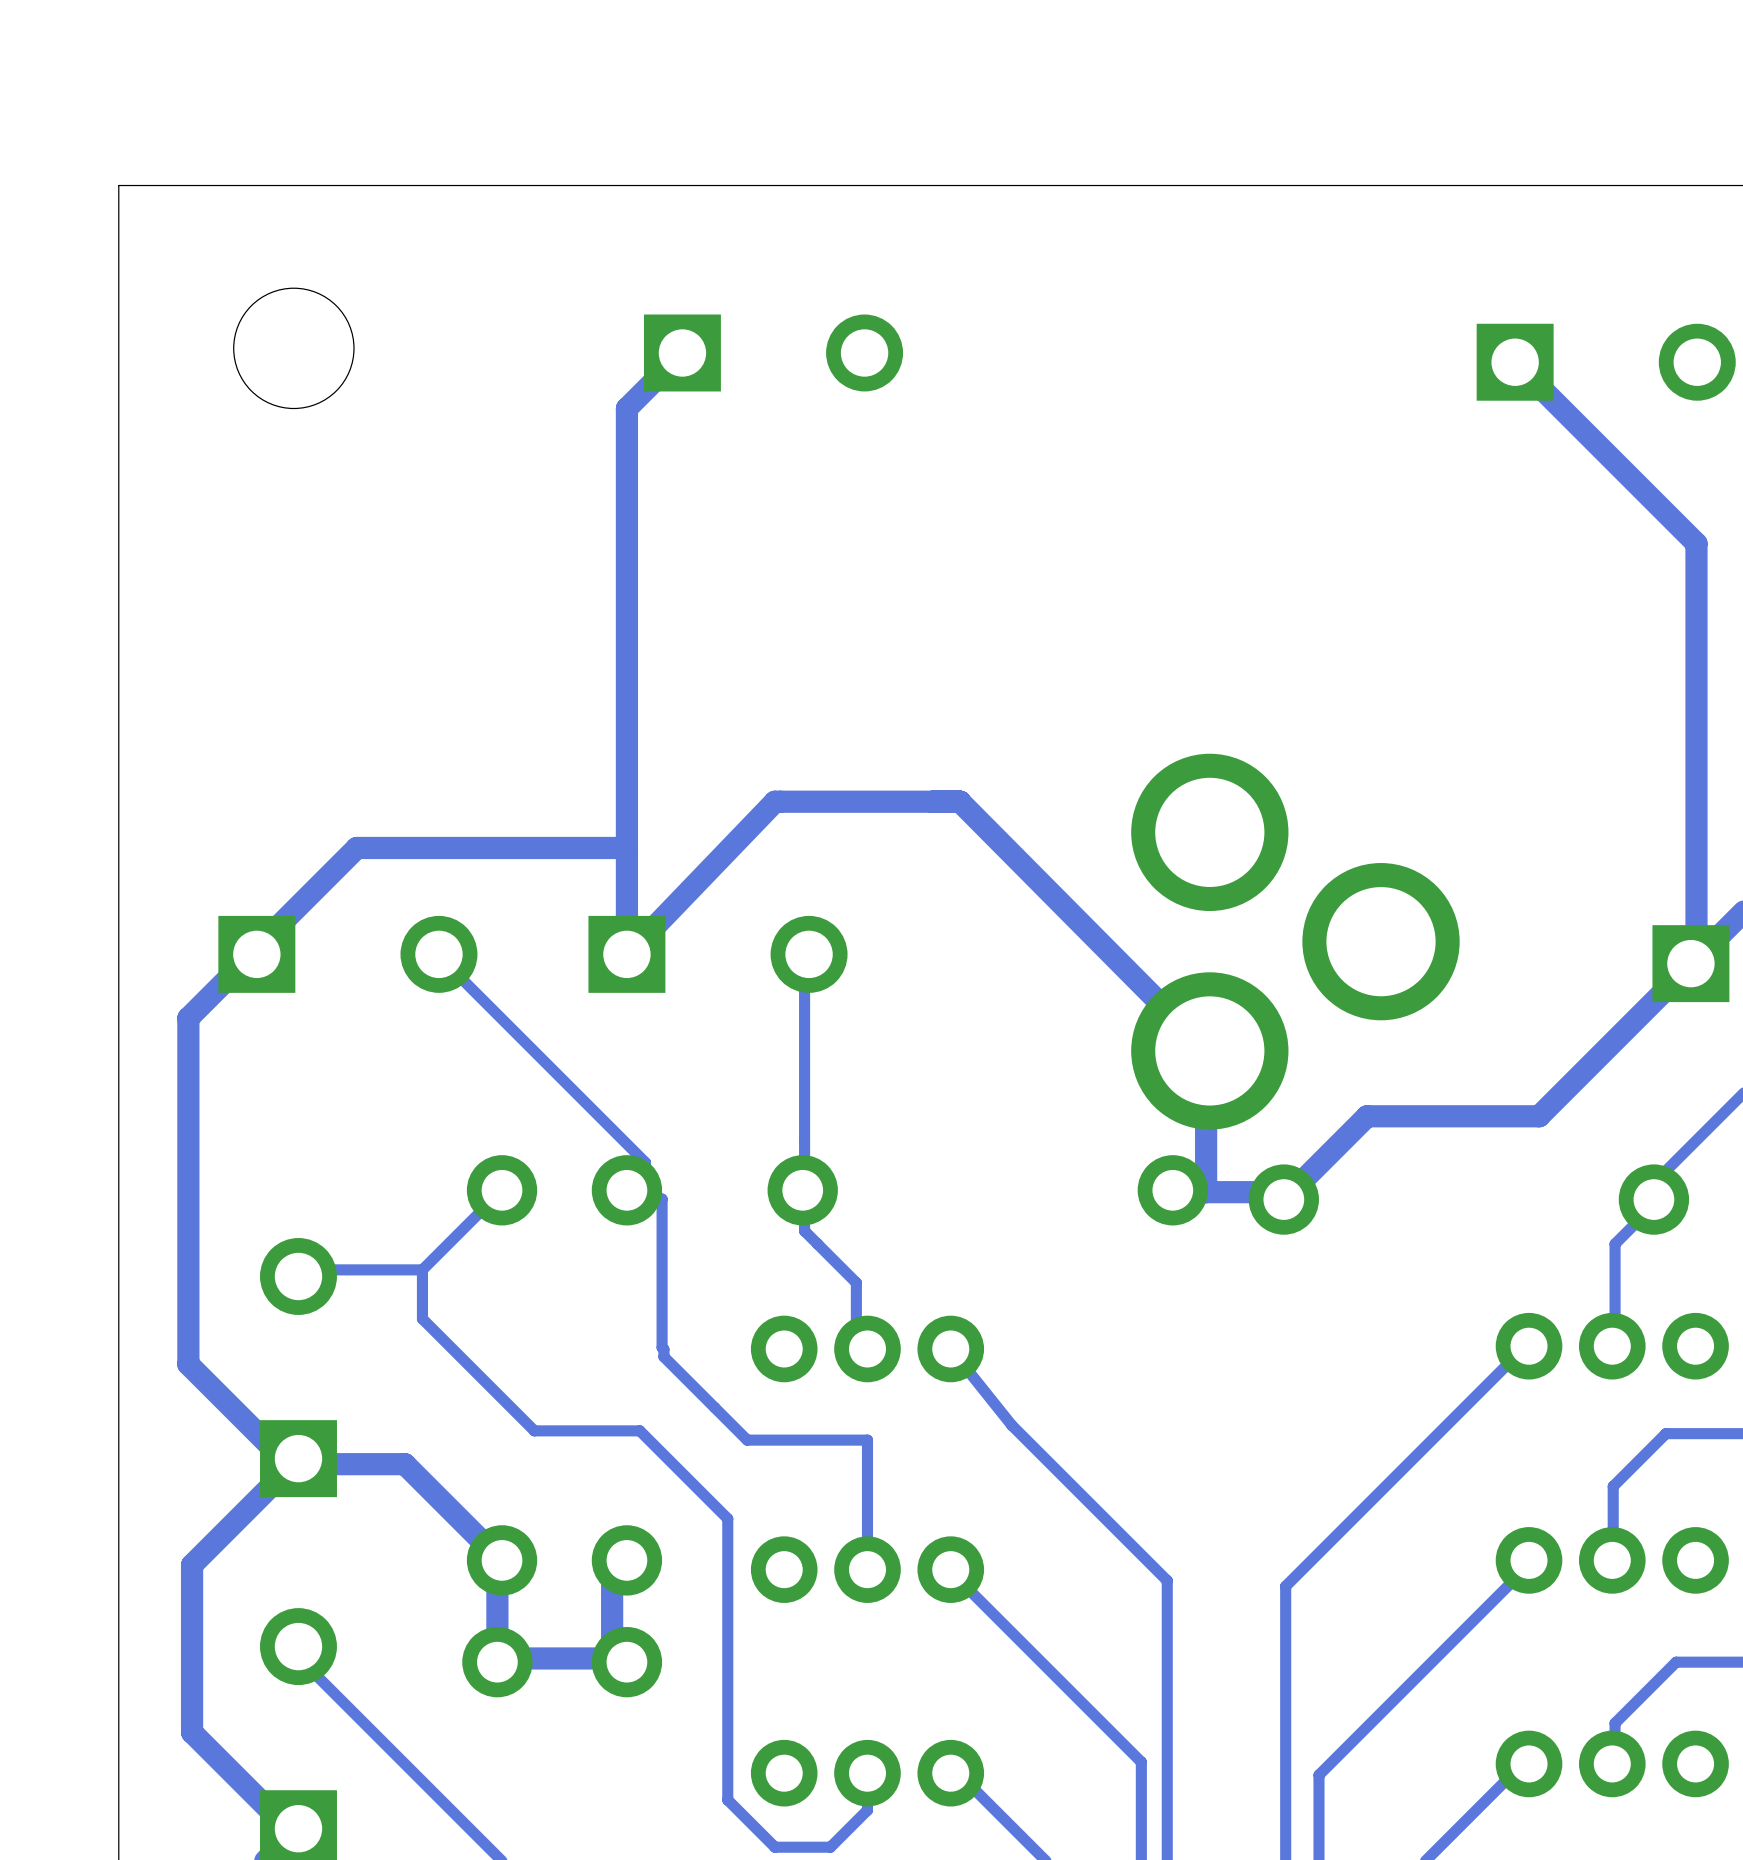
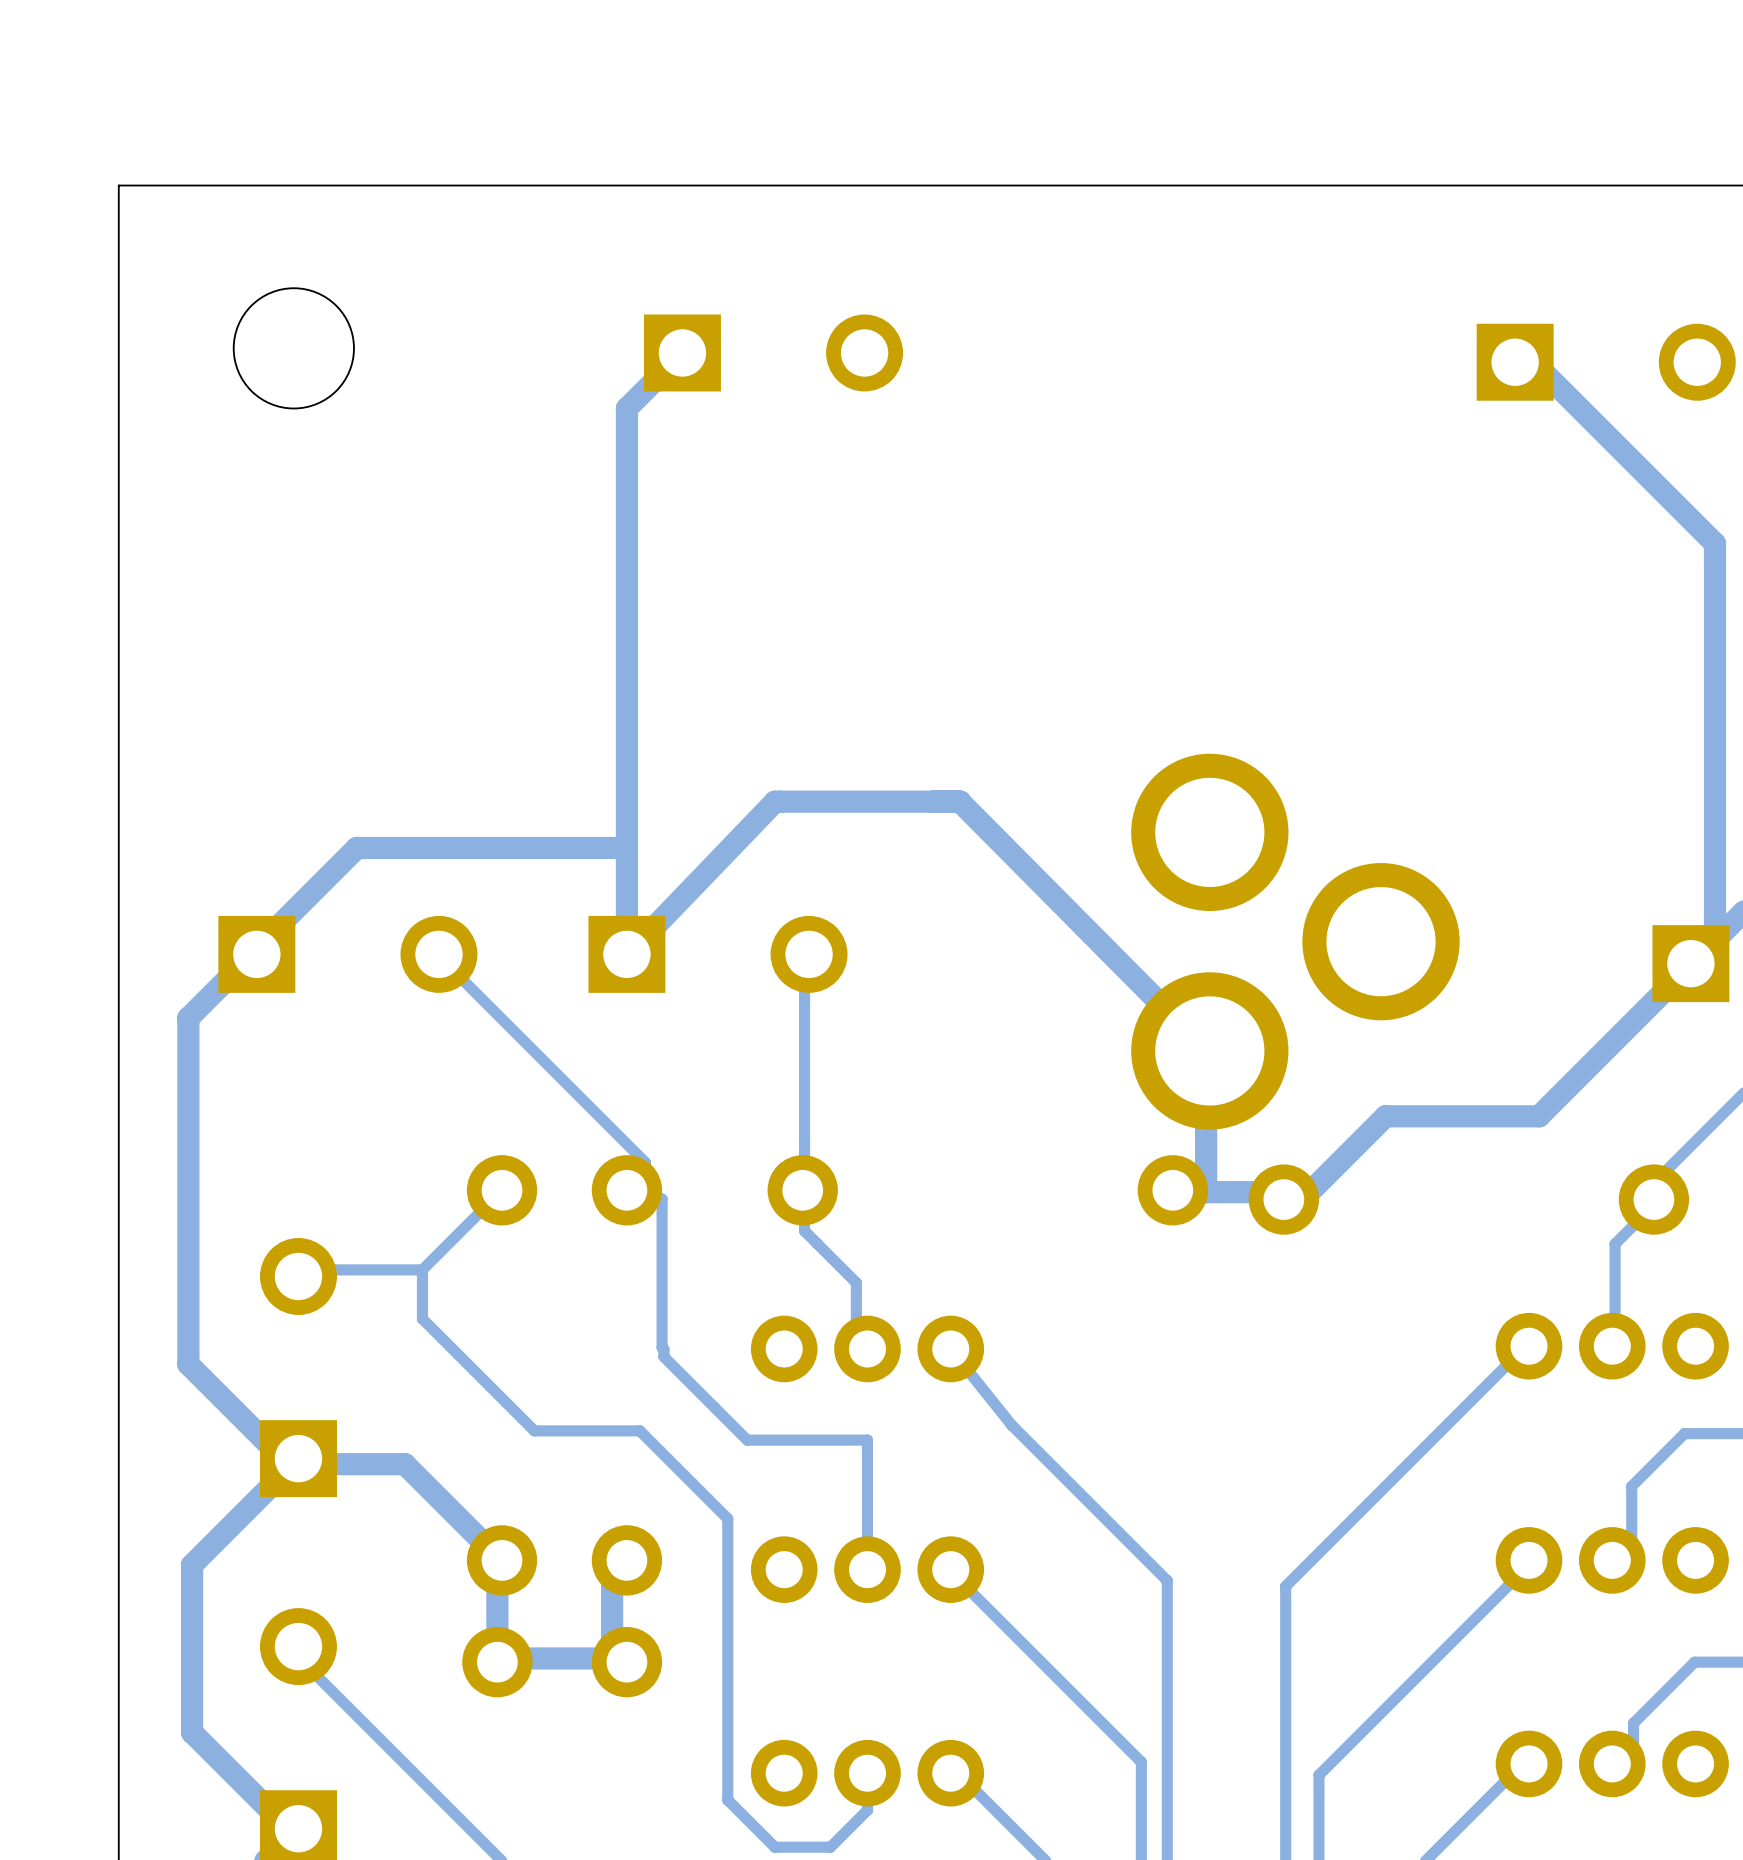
bottom track: (1515, 362) (1696, 543) (1696, 959) (1690, 963) -> (1533, 362) (1714, 543) (1714, 959) (1709, 963)
bottom track: (1385, 1116) (1367, 1116) (1283, 1199) (1278, 1192) -> (1385, 1116) (1302, 1199) (1296, 1192) (1278, 1192)
bottom track: (1684, 1433) (1665, 1433) (1613, 1486) (1612, 1560) -> (1684, 1433) (1631, 1486) (1630, 1560)
bottom track: (1694, 1662) (1676, 1662) (1615, 1723) (1615, 1762) (1612, 1763) -> (1694, 1662) (1633, 1723) (1633, 1762) (1630, 1763)

